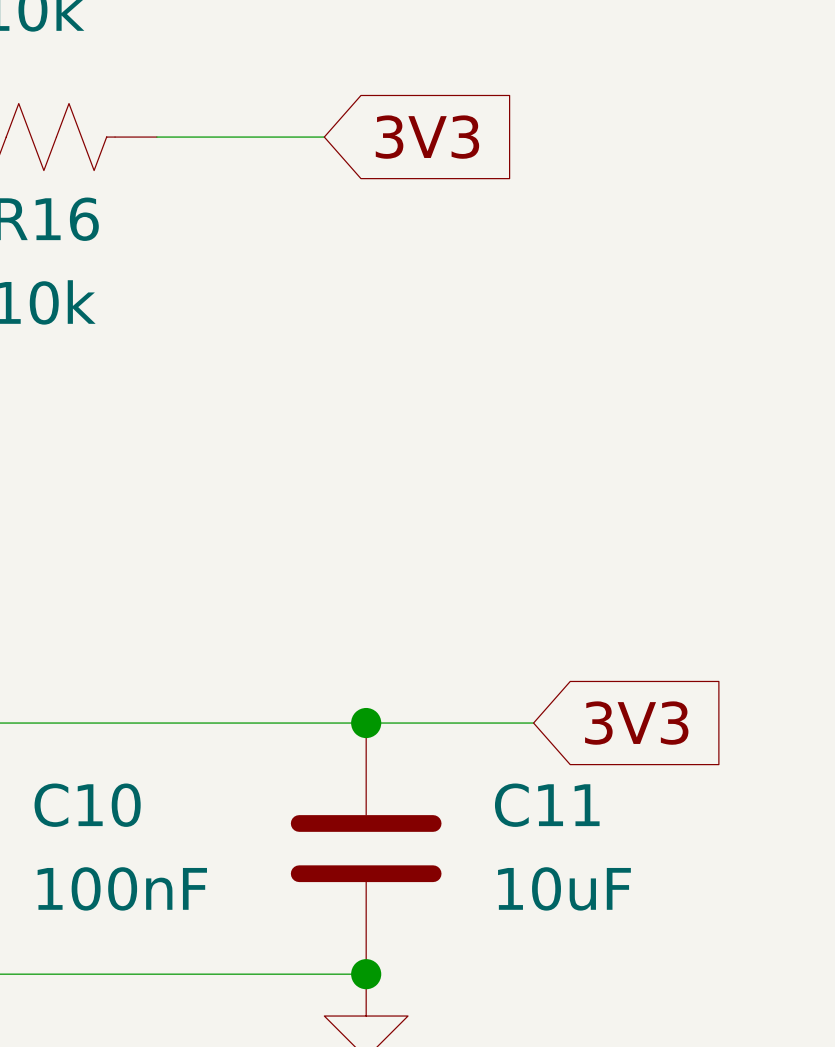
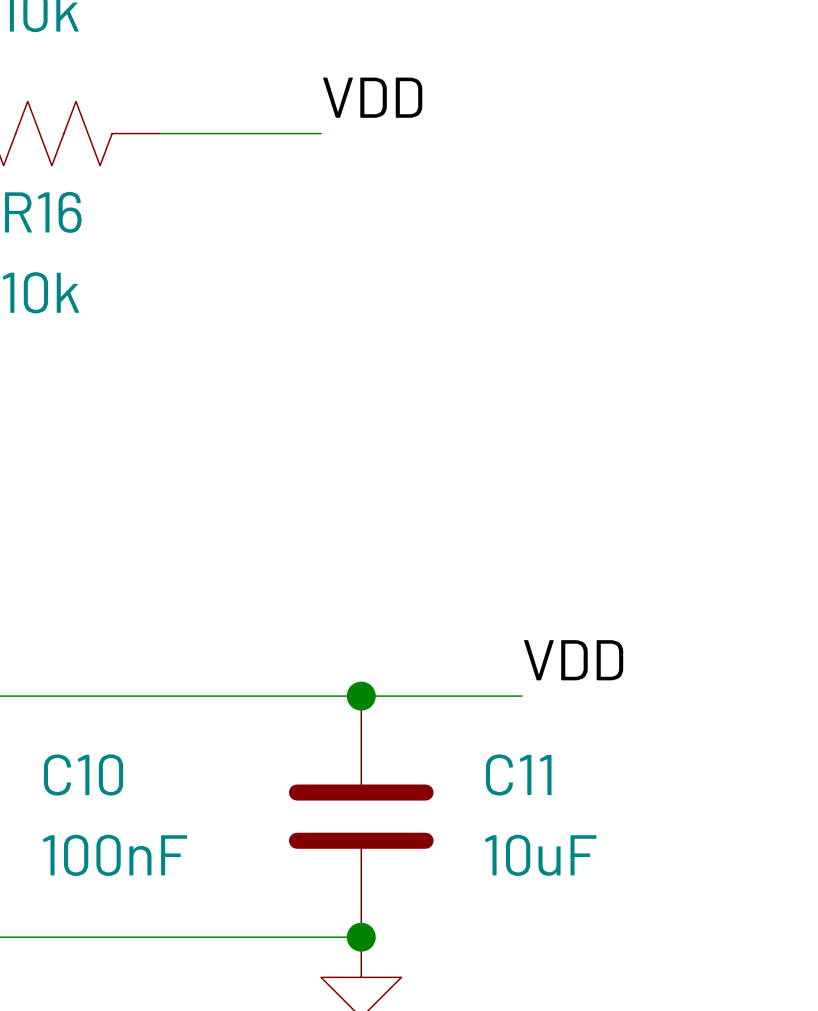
label: none -> VDD (372, 97)
global label: 3V3 (427, 137) -> none
label: none -> VDD (573, 660)
global label: 3V3 (636, 723) -> none

